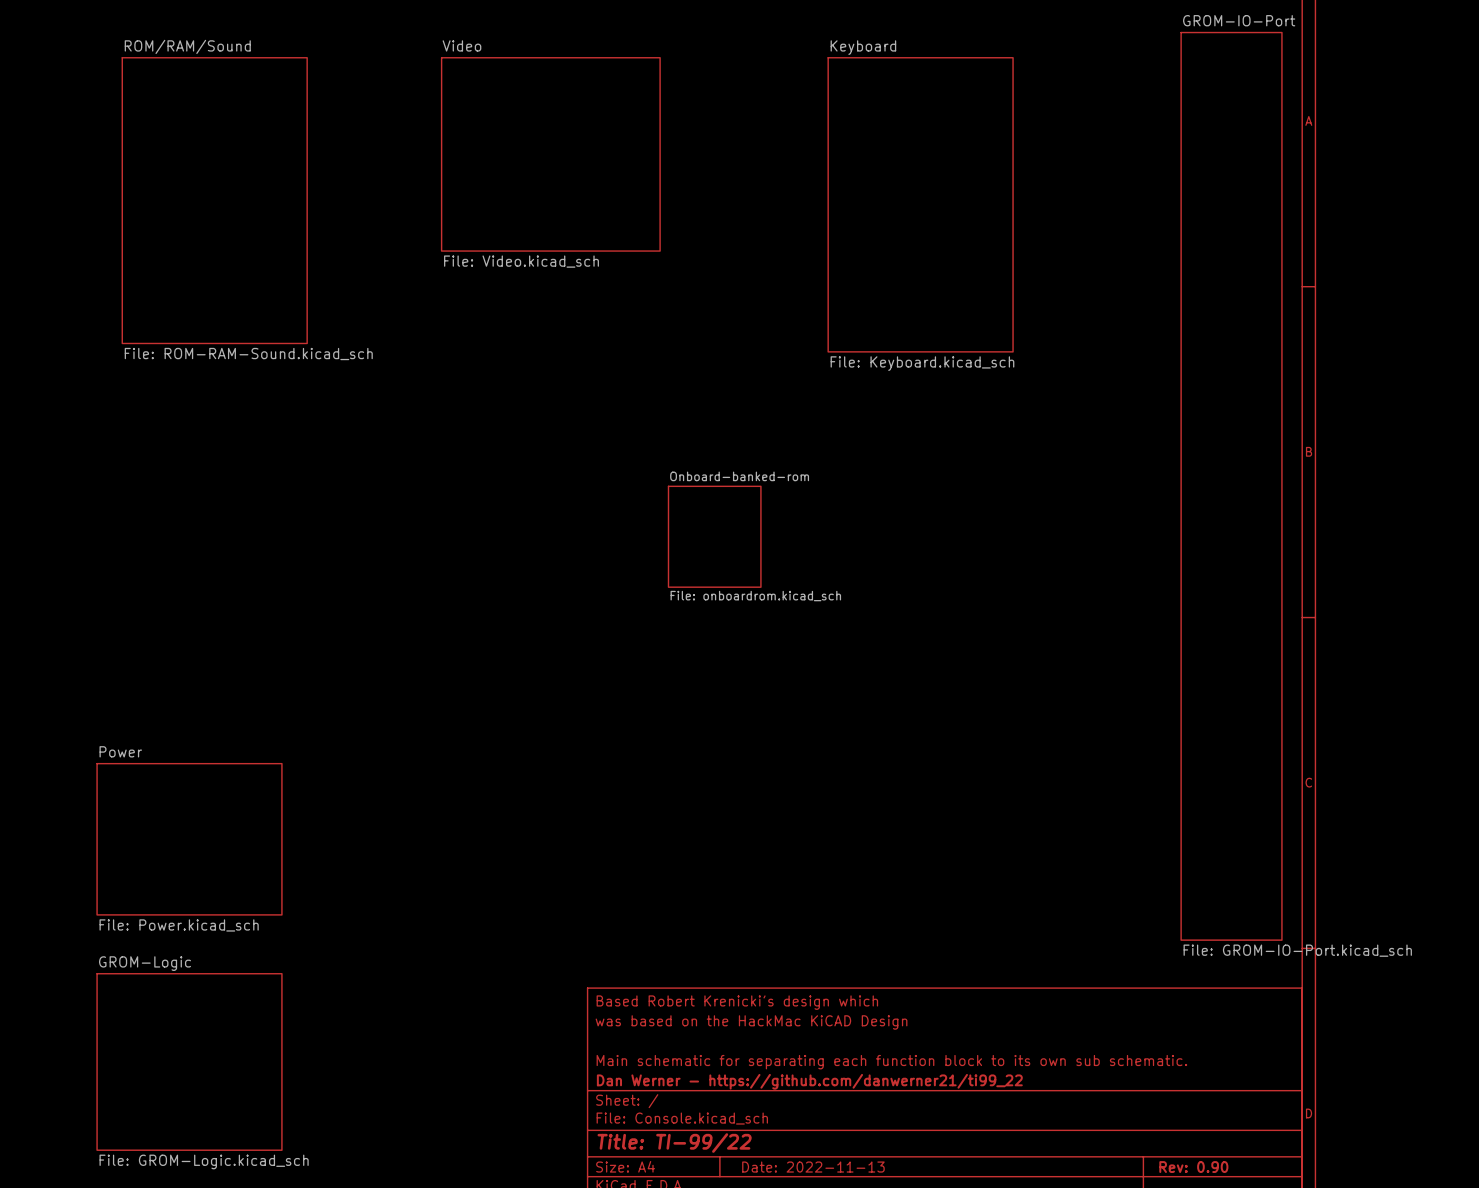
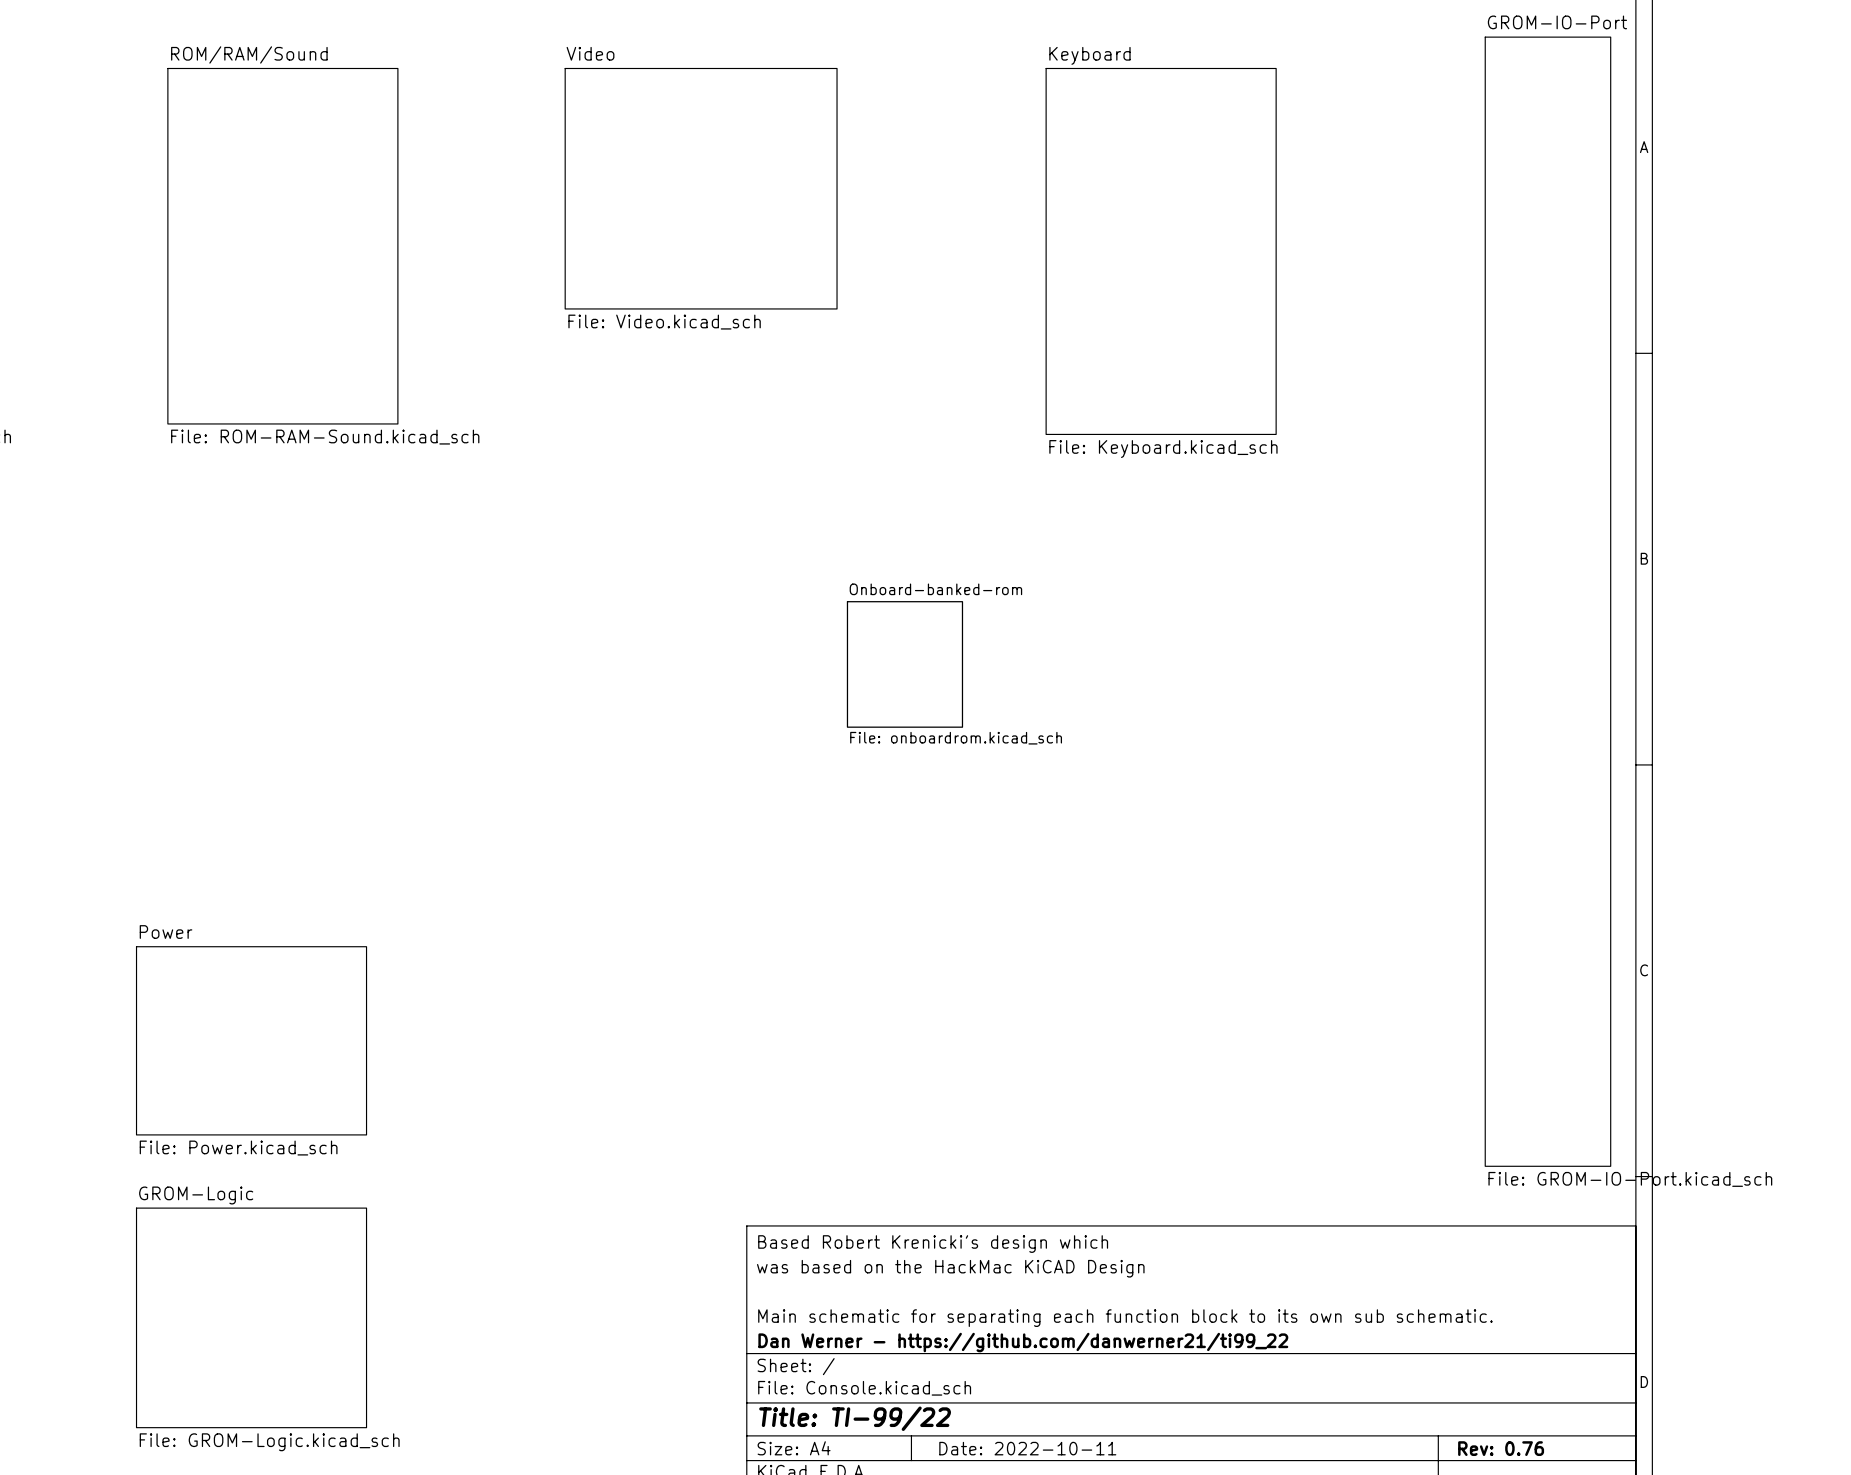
title block: Date: 2022-11-13 (813, 1167) -> Date: 2022-10-11 (1027, 1448)
title block: Rev: 0.90 (1193, 1167) -> Rev: 0.76 (1501, 1448)

